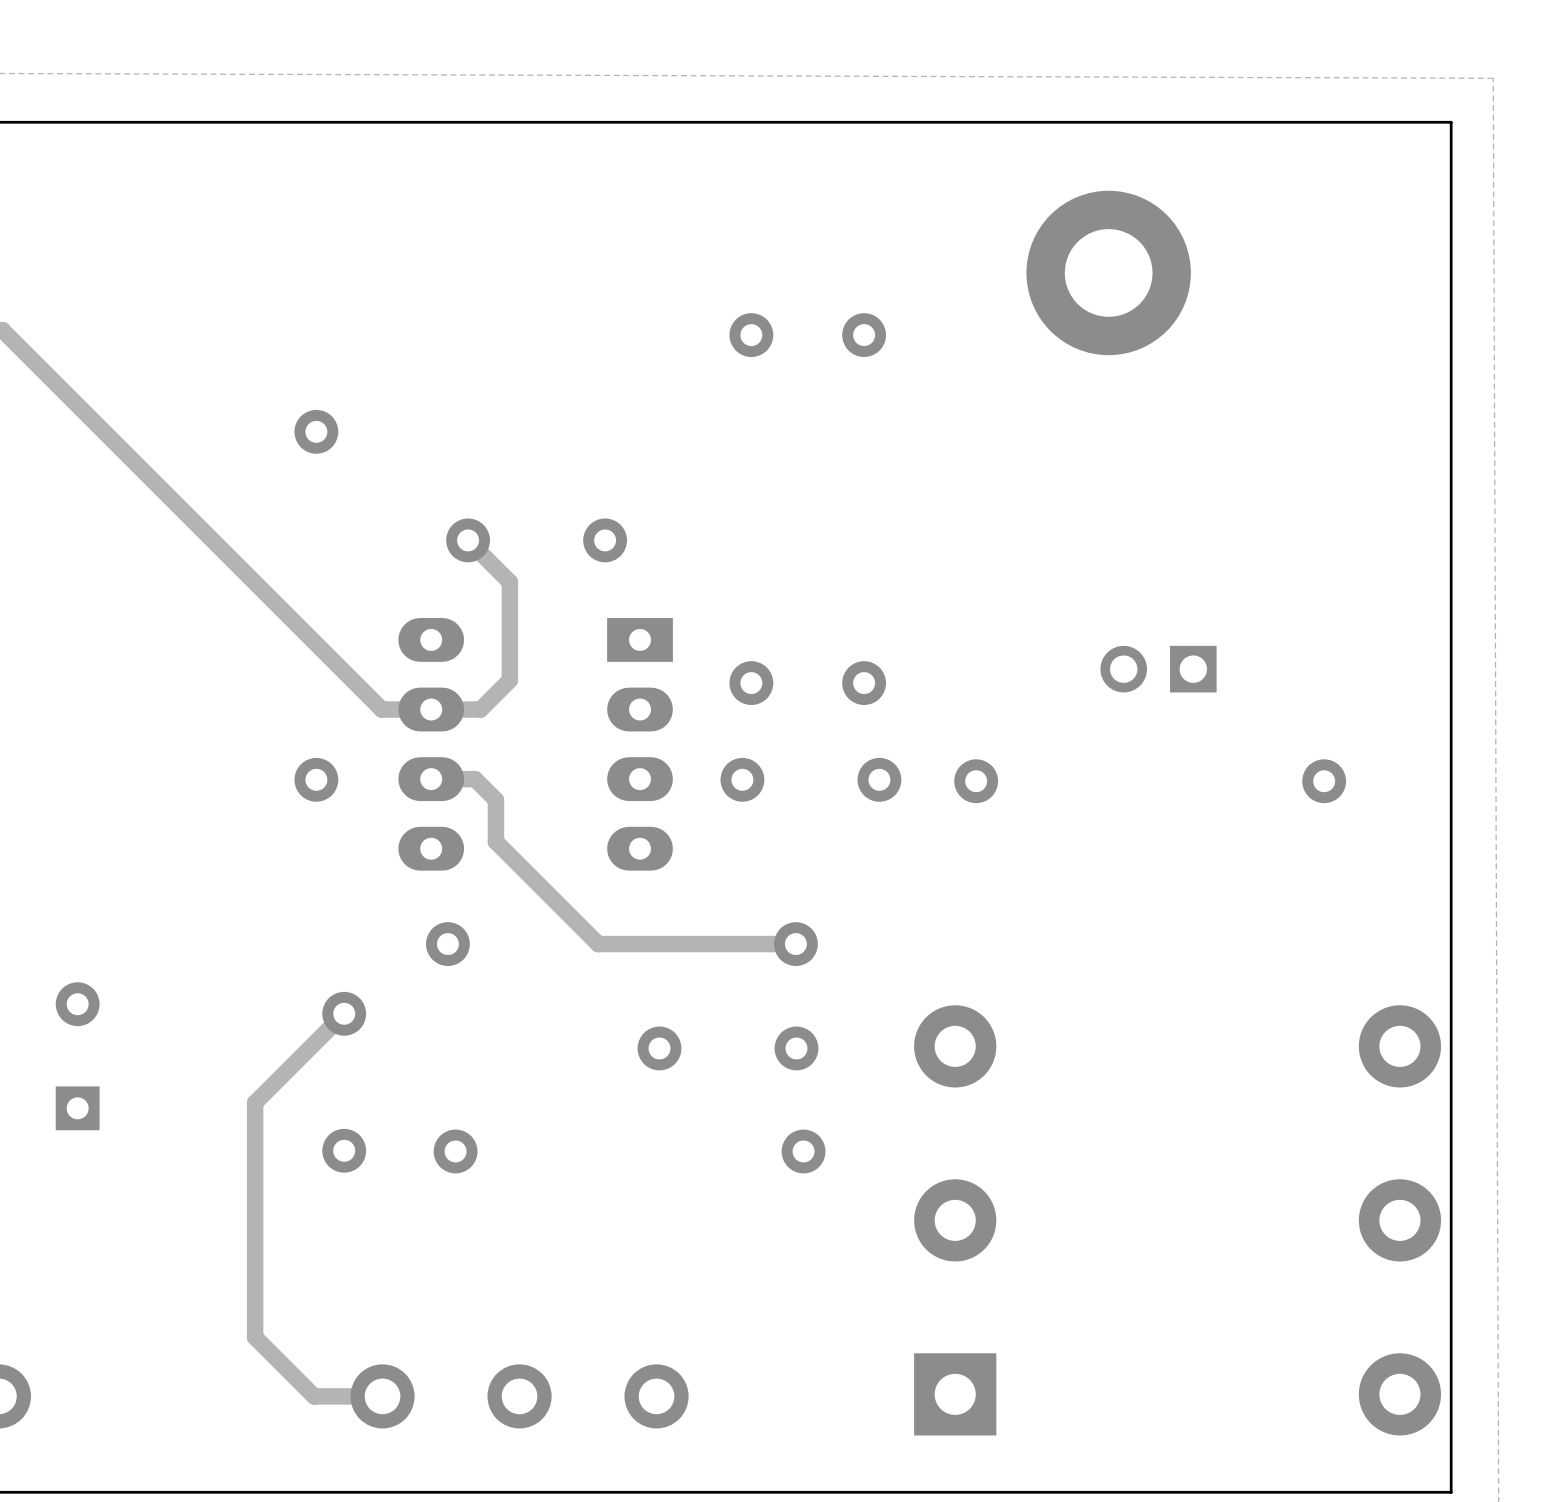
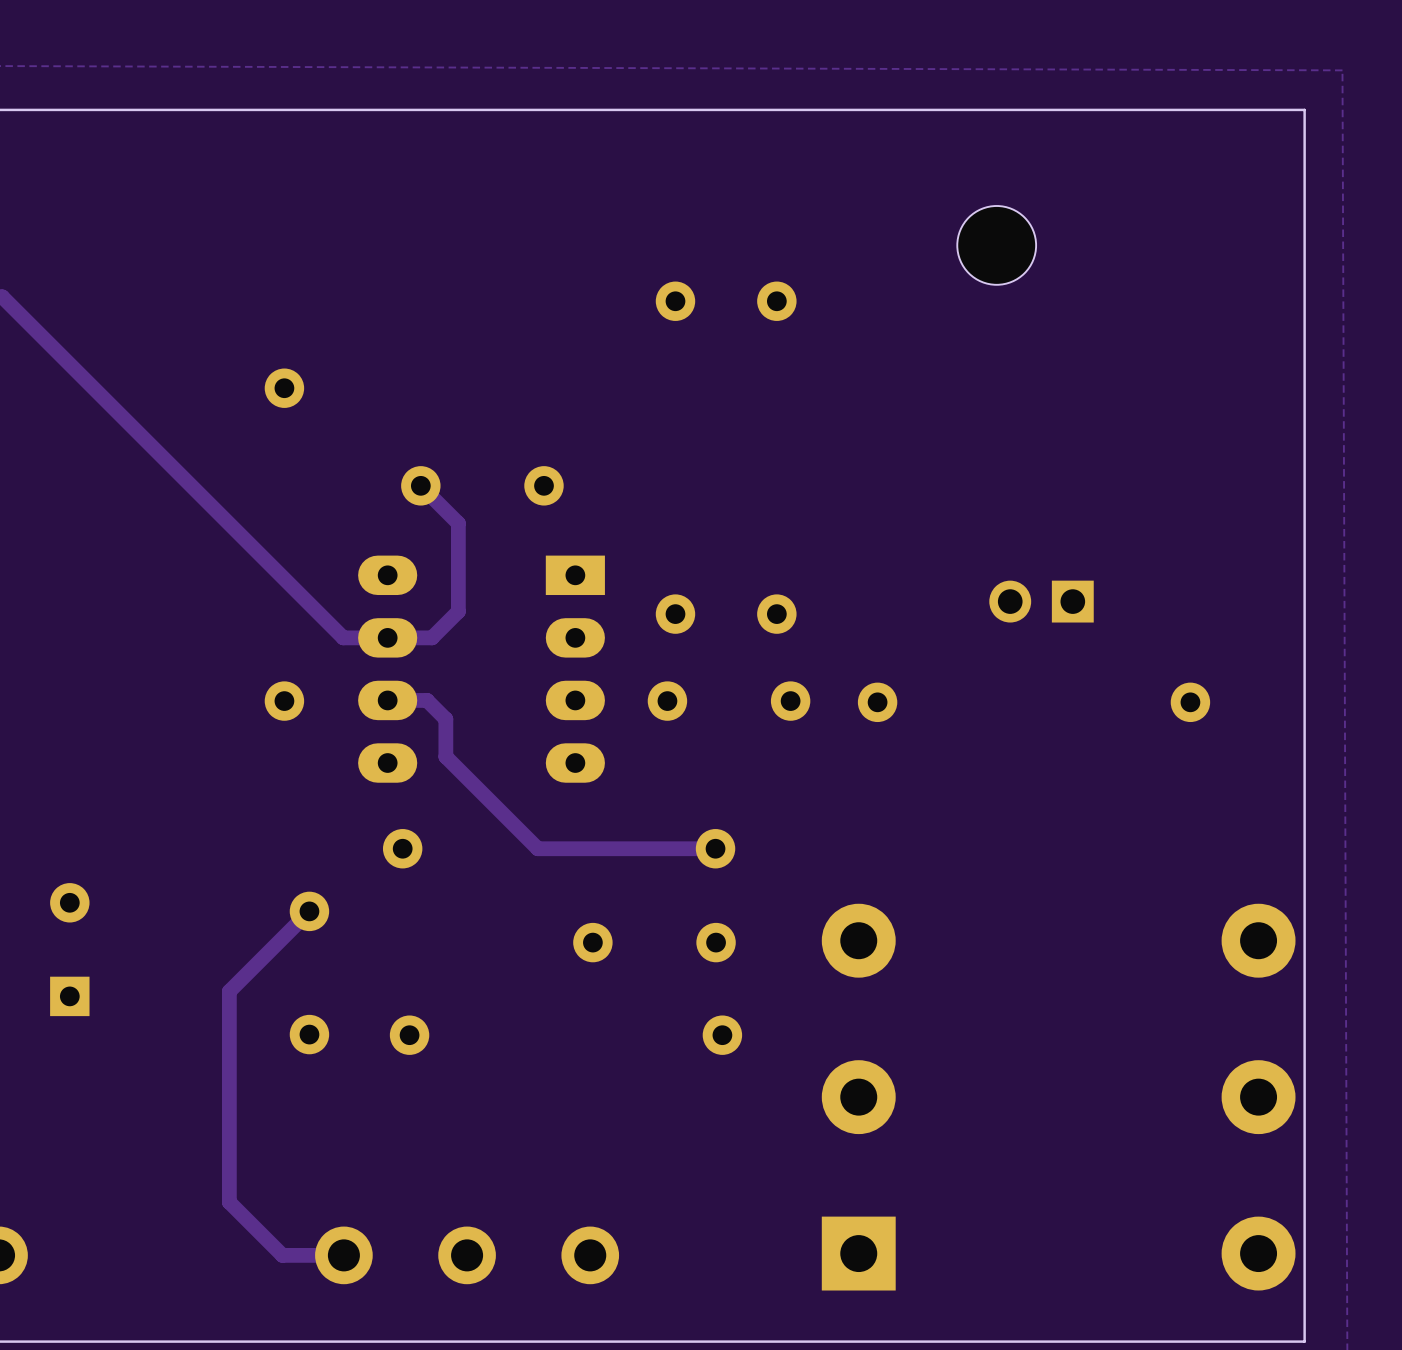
part footprint: [1026, 190, 1191, 356] -> [957, 205, 1037, 285]

